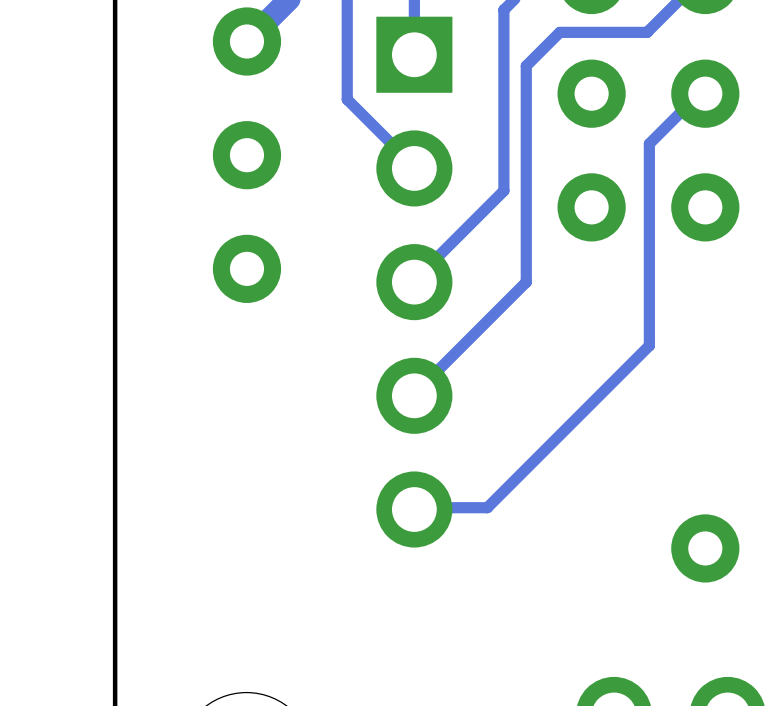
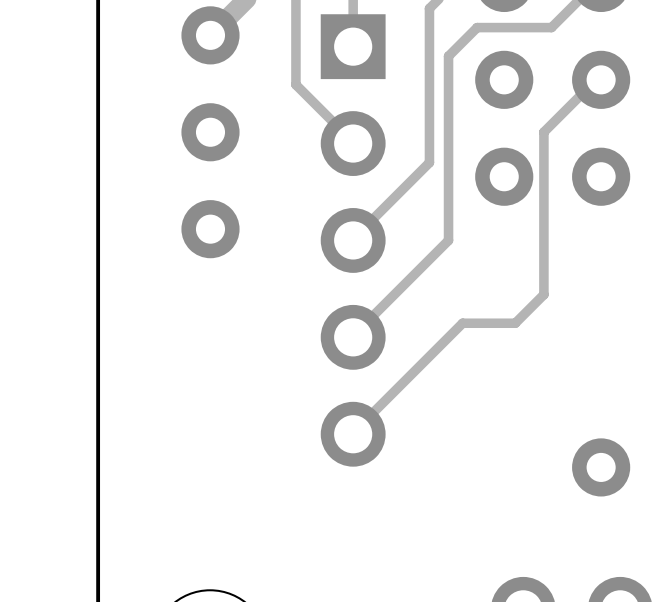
track: (649, 143) (649, 345) (487, 507) (414, 507) -> (553, 122) (543, 132) (543, 294) (515, 323) (462, 323) (353, 432)

